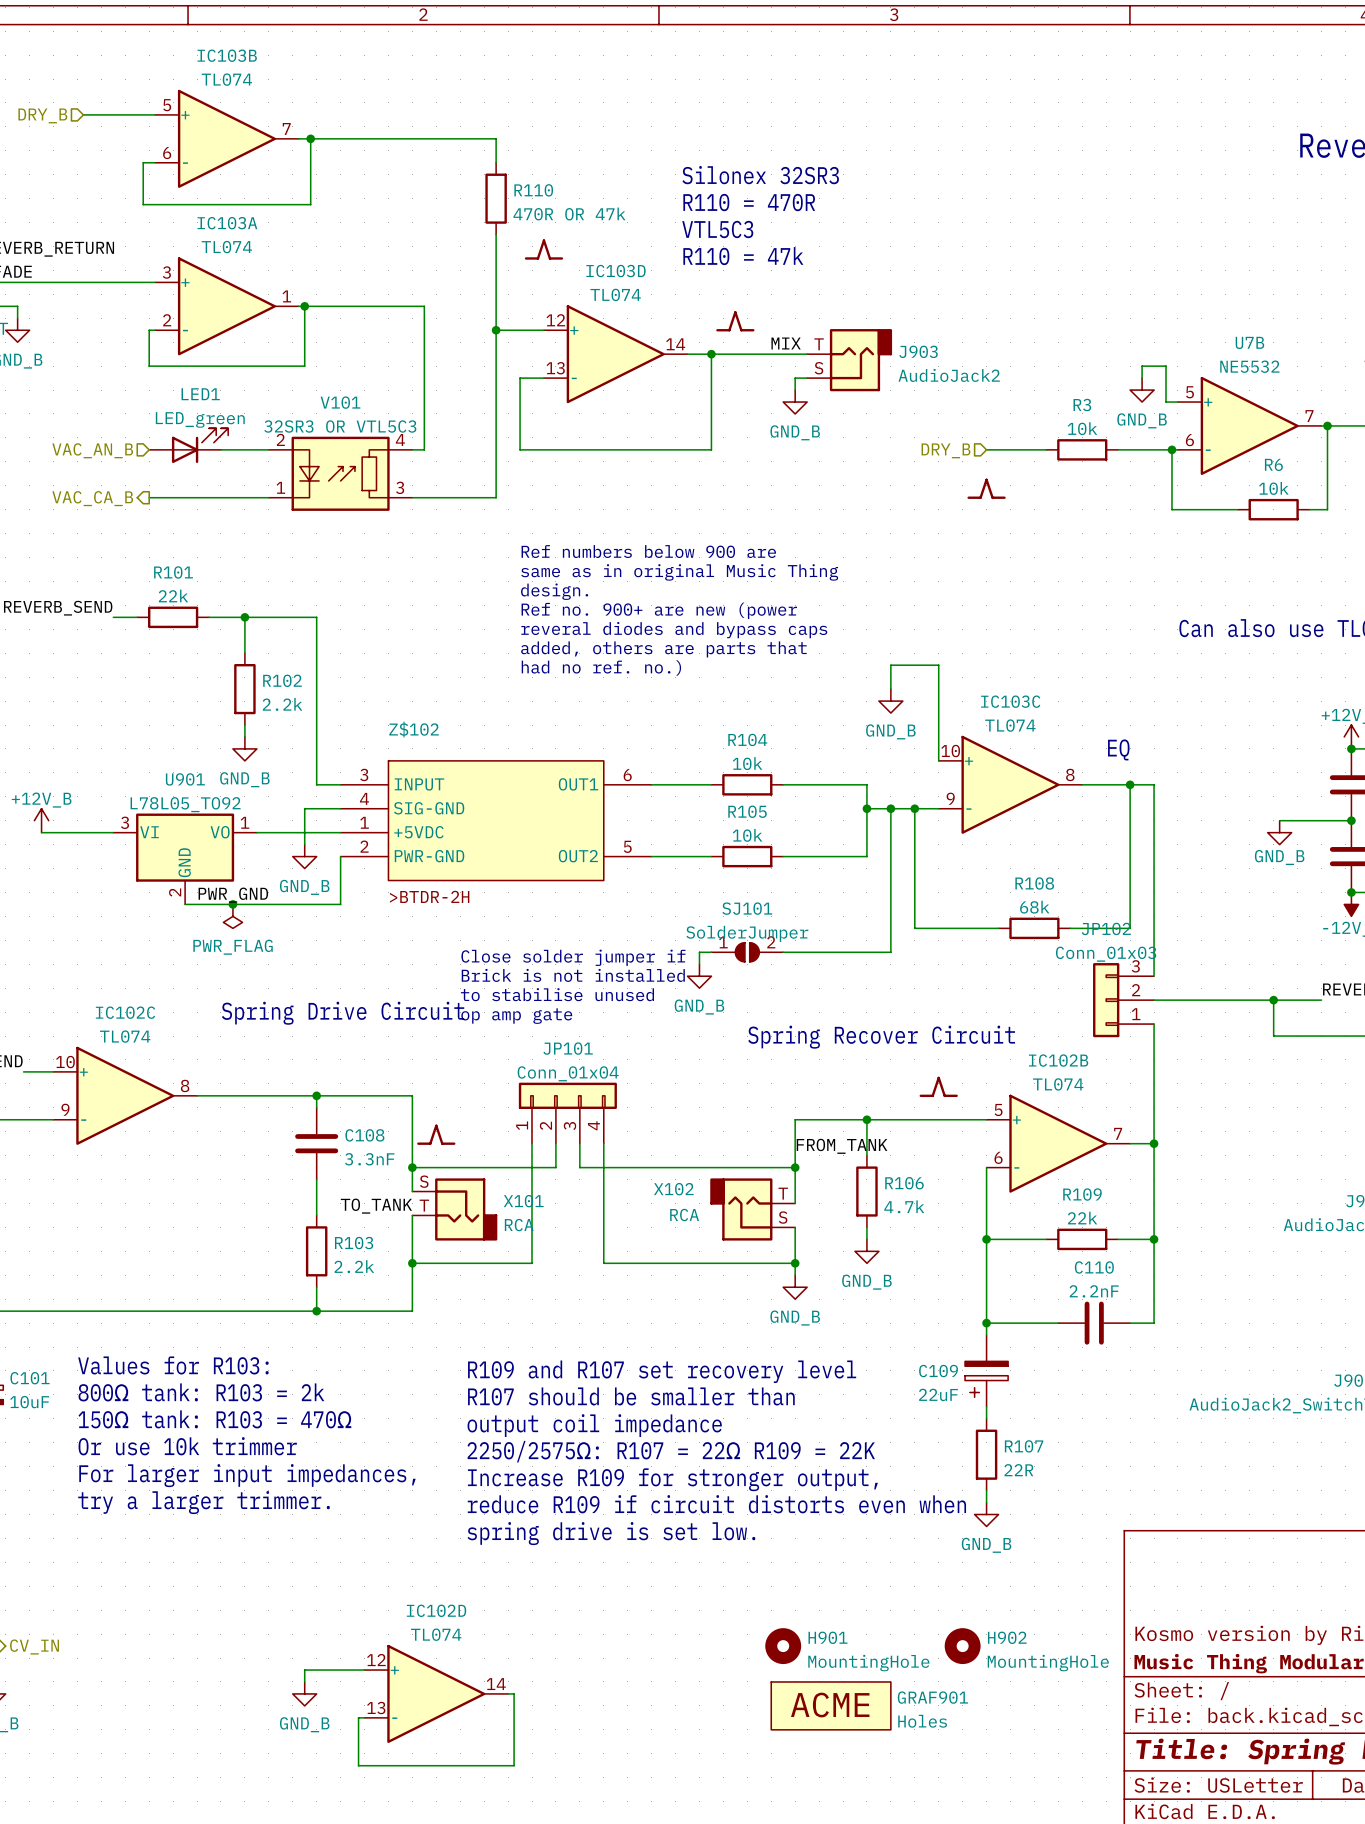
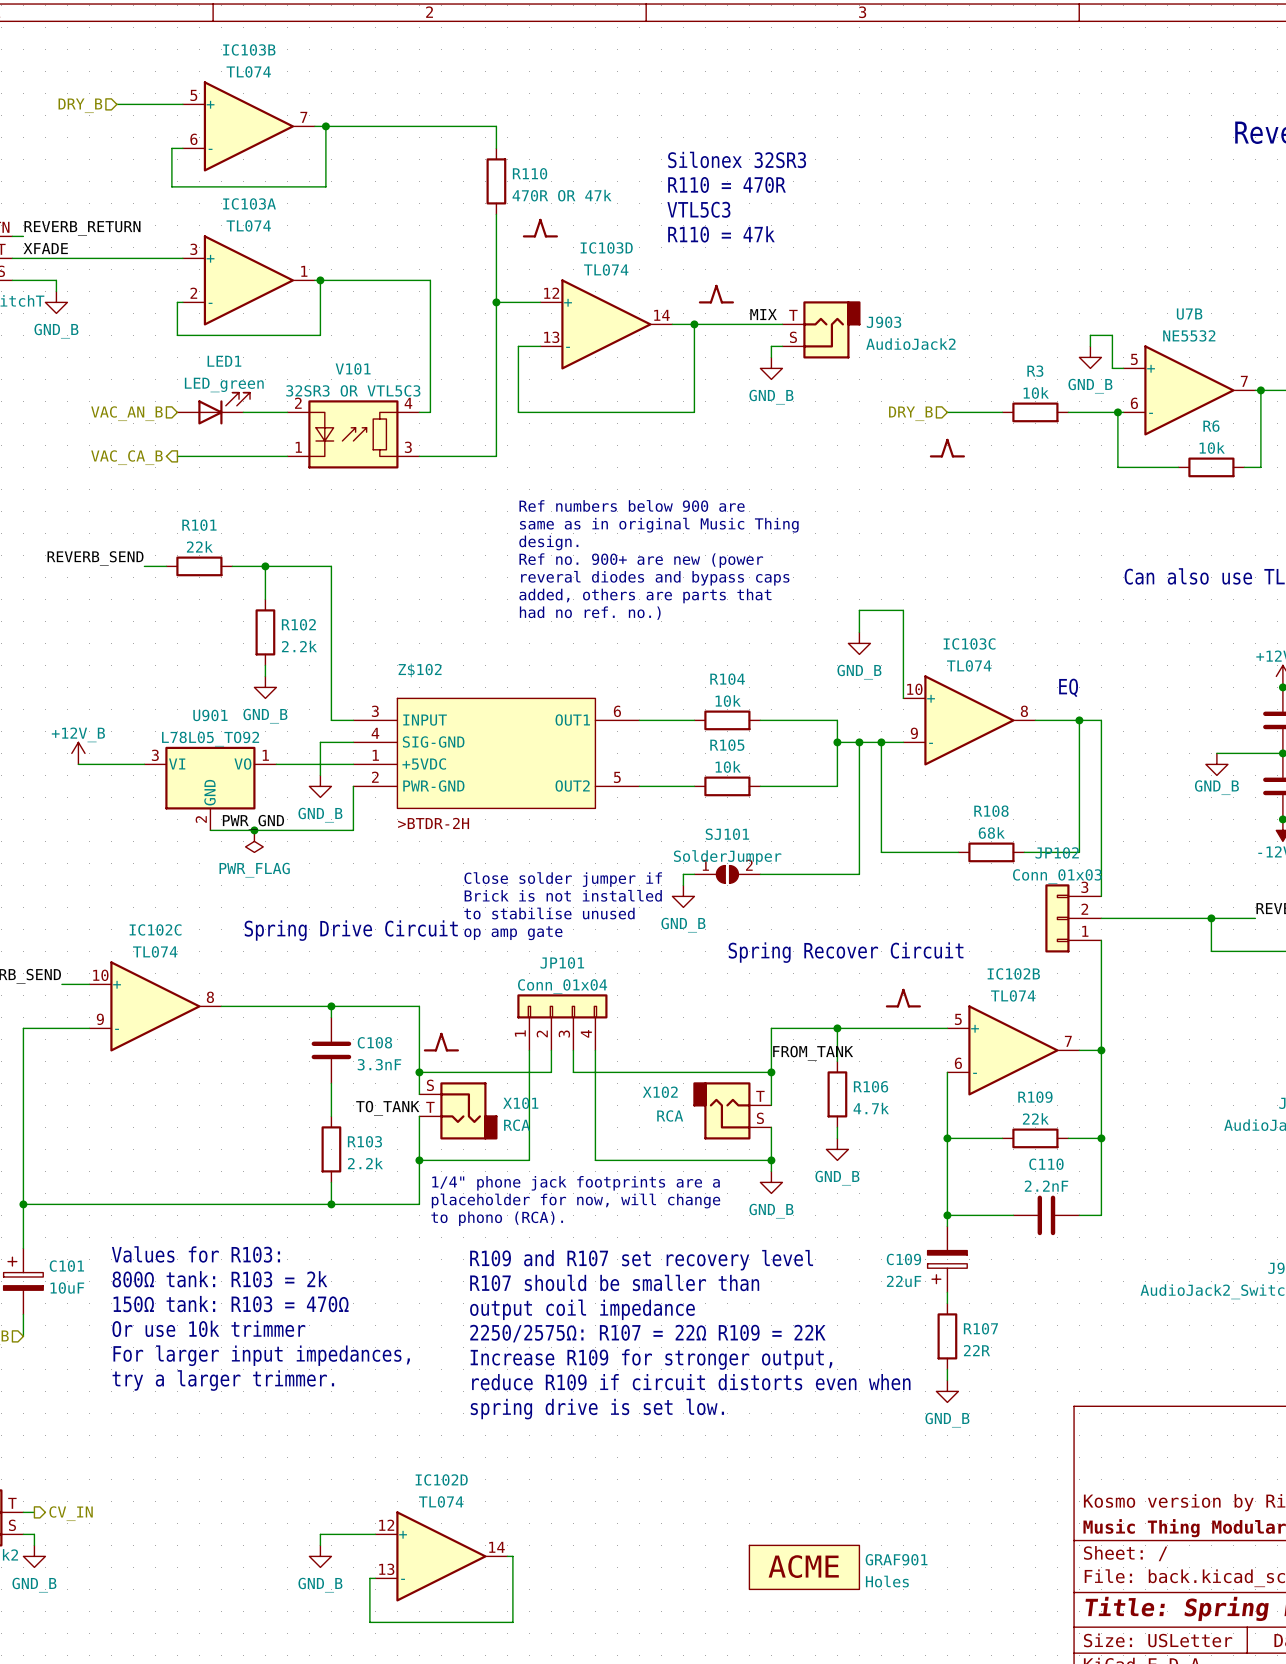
text: none -> 1/4" phone jack footprints are a (576, 1183)
text: none -> placeholder for now, will change (576, 1201)
text: none -> to phono (RCA). (497, 1218)
H901: MountingHole (783, 1646) -> none
H902: MountingHole (962, 1646) -> none

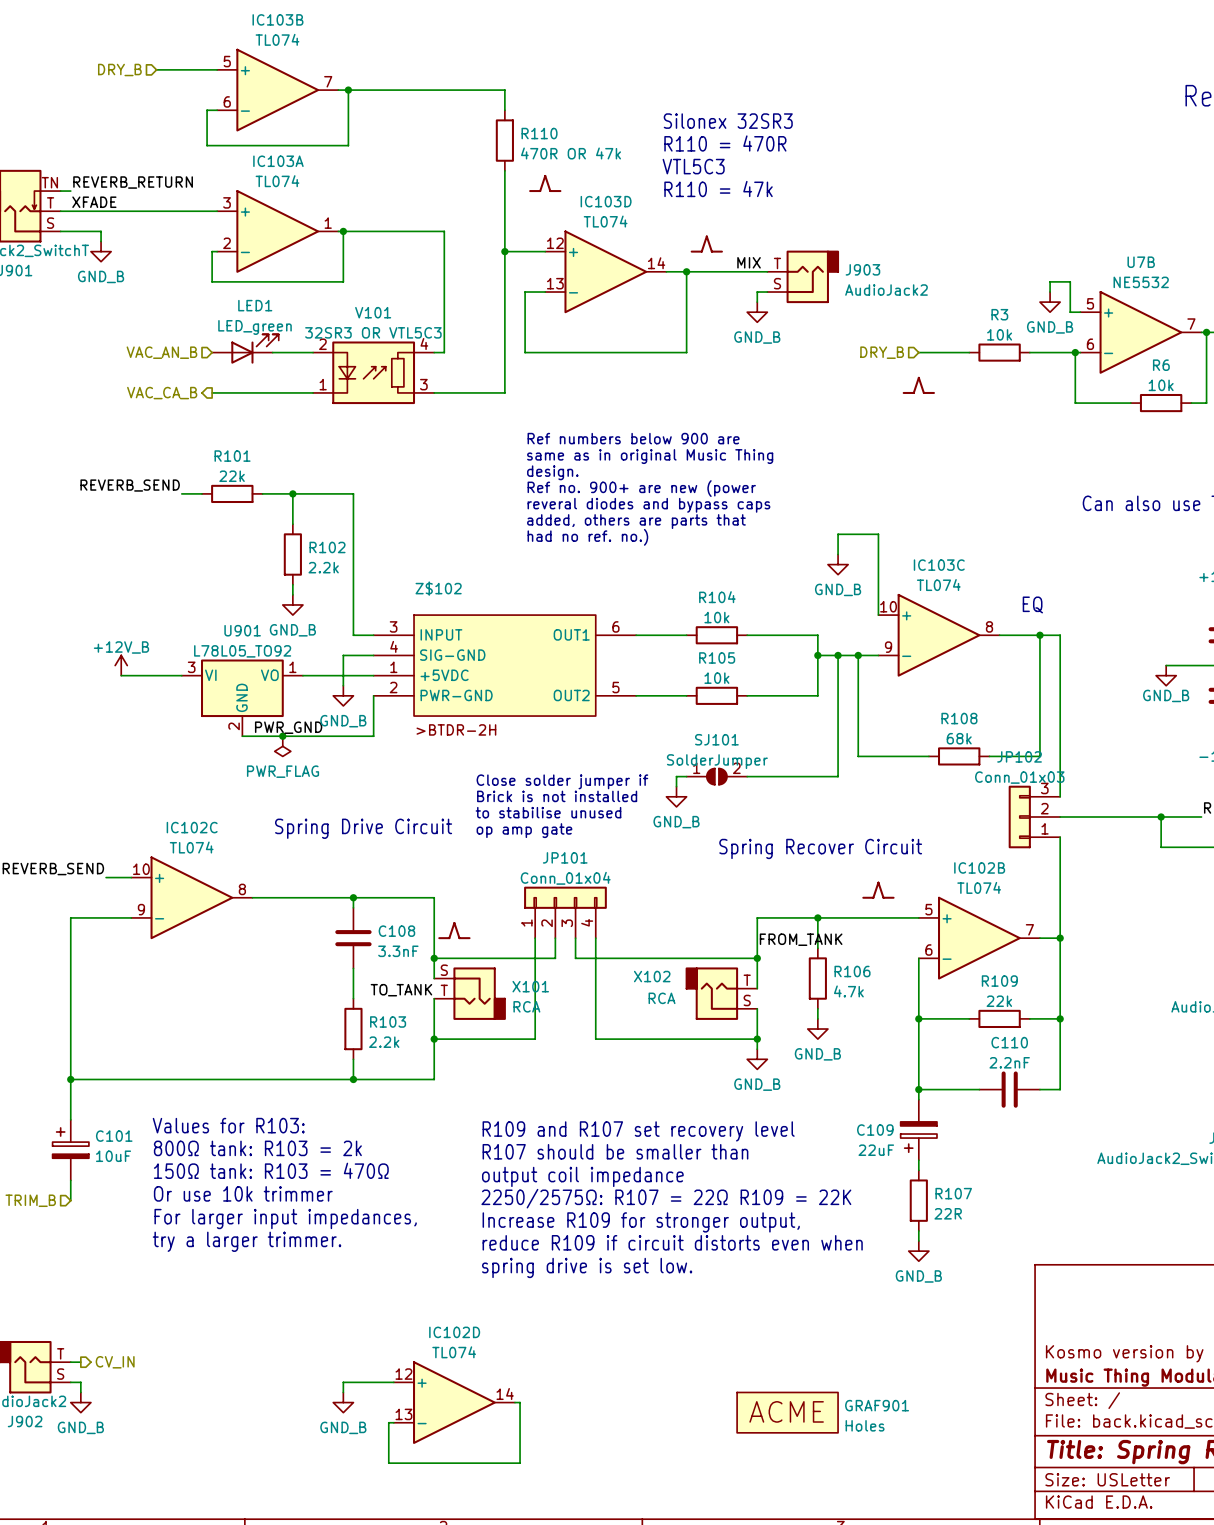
text: 1/4" phone jack footprints are a (576, 1183) -> none
text: placeholder for now, will change (576, 1201) -> none
text: to phono (RCA). (497, 1218) -> none

